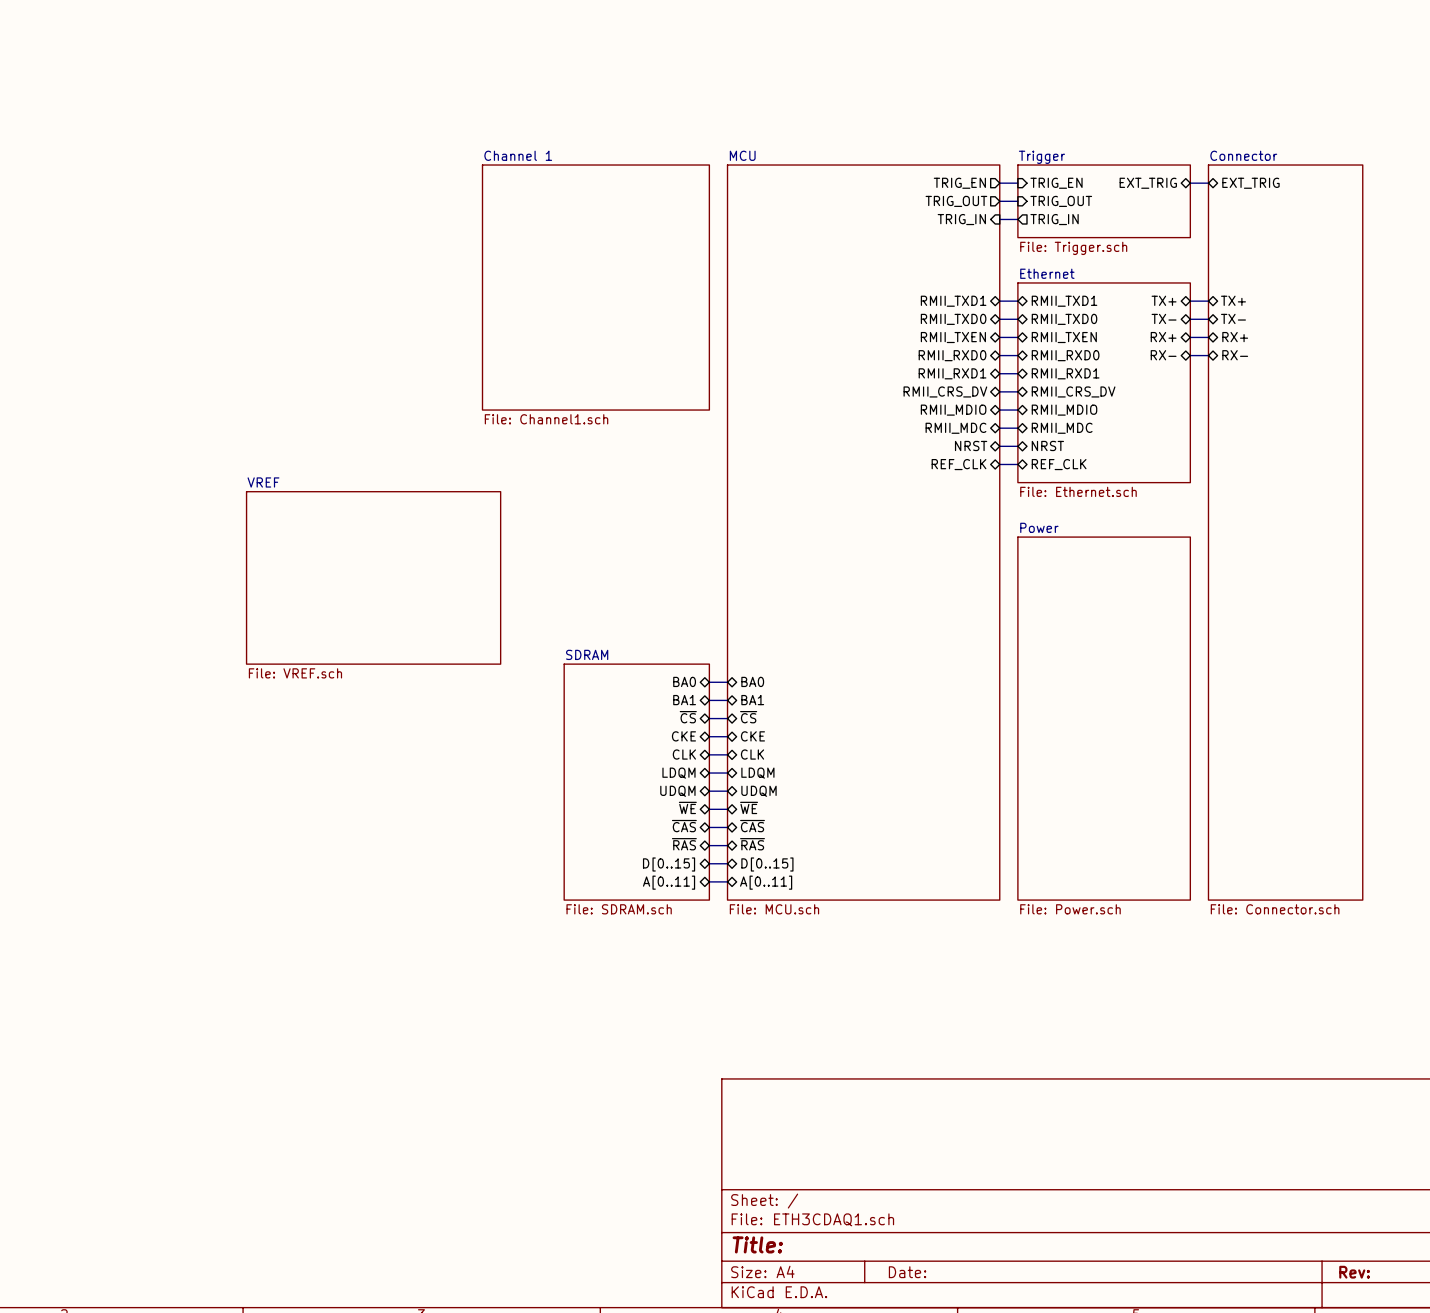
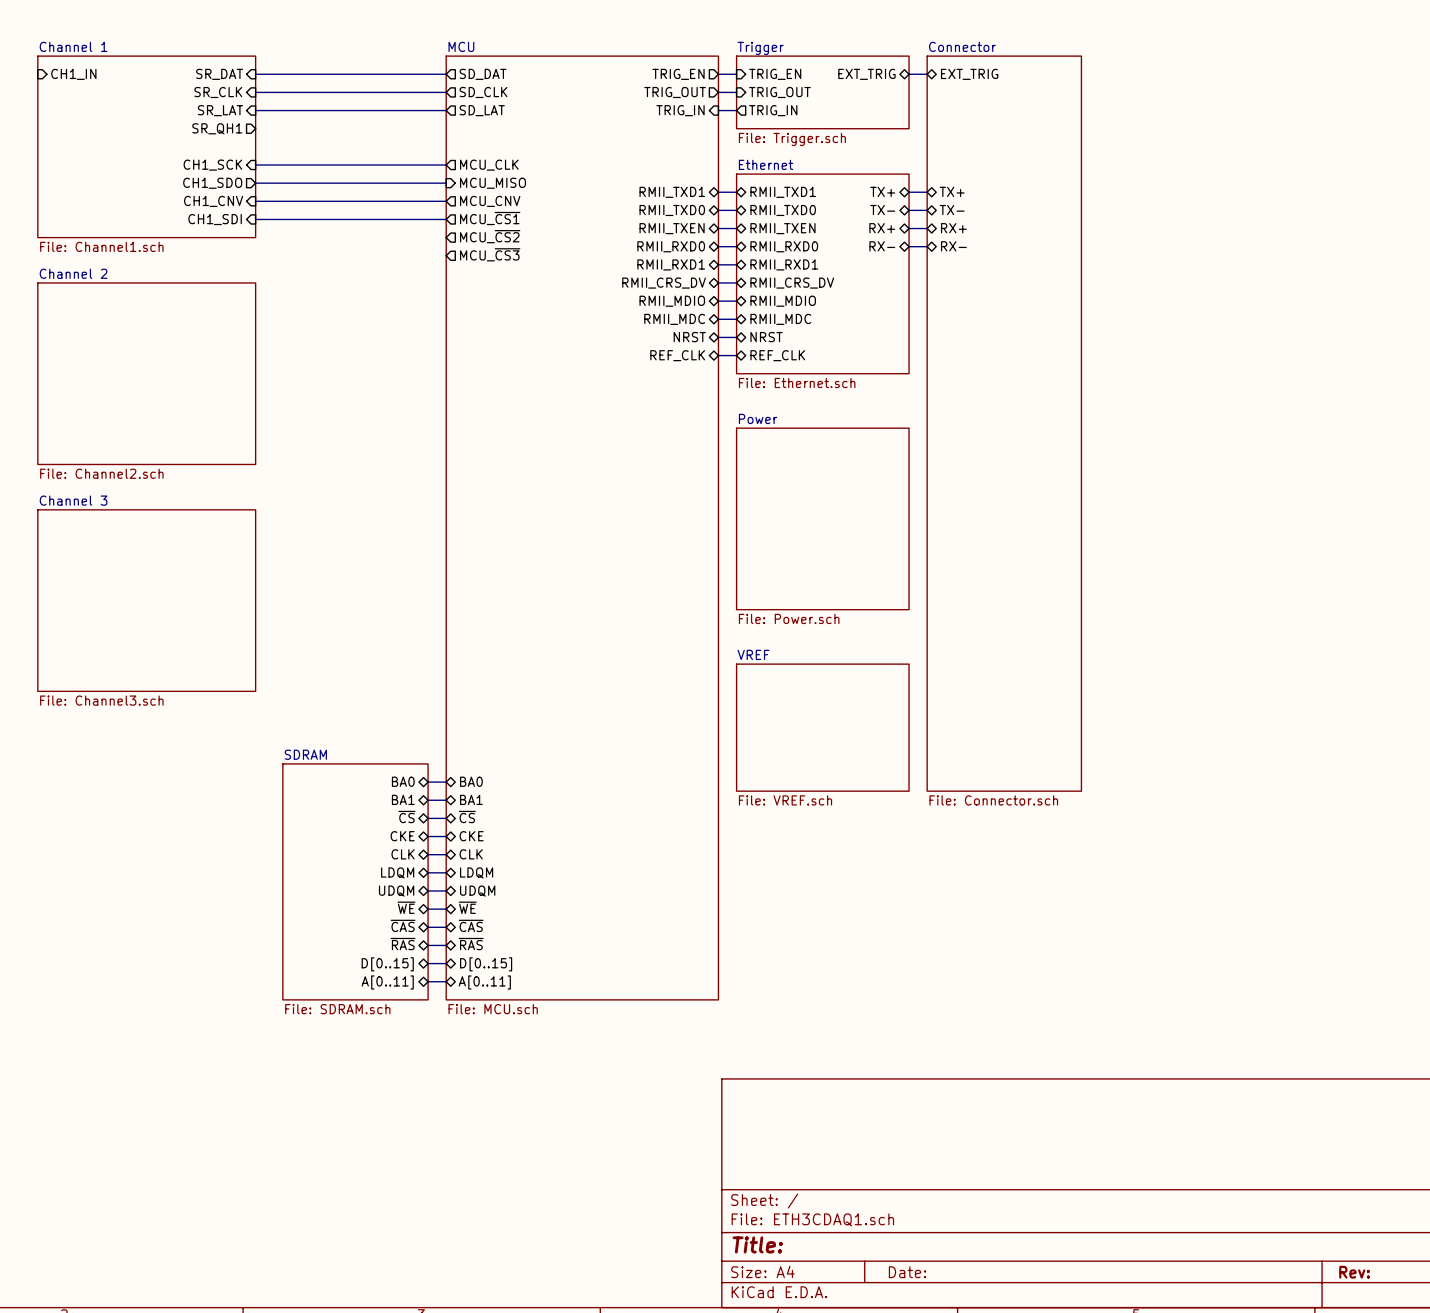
sheet pin: none -> CH1_IN (73, 74)
sheet pin: none -> SR_DAT (219, 74)
wire: none -> (255, 74) (446, 74)
sheet pin: none -> SD_DAT (483, 74)
sheet pin: none -> TRIG_EN (678, 74)
wire: none -> (718, 74) (736, 74)
sheet pin: none -> TRIG_EN (775, 74)
sheet pin: none -> EXT_TRIG (866, 74)
sheet pin: none -> EXT_TRIG (969, 74)
sheet pin: none -> SR_CLK (218, 92)
wire: none -> (255, 92) (446, 92)
sheet pin: none -> SD_CLK (483, 92)
sheet pin: none -> TRIG_OUT (675, 92)
wire: none -> (718, 92) (736, 92)
sheet pin: none -> TRIG_OUT (779, 92)
sheet Trigger: none -> File: Trigger.sch (822, 92)
sheet pin: none -> SR_LAT (220, 110)
wire: none -> (255, 110) (446, 110)
sheet pin: none -> SD_LAT (482, 110)
sheet pin: none -> TRIG_IN (680, 110)
wire: none -> (718, 110) (736, 110)
sheet pin: none -> TRIG_IN (773, 110)
sheet pin: none -> SR_QH1 (217, 128)
sheet Channel 1 name position: Channel 1 (518, 155) -> Channel 1 (73, 46)
sheet pin: none -> CH1_SCK (212, 165)
wire: none -> (255, 165) (446, 165)
sheet Channel 1 shape: [482, 165, 710, 411] -> [37, 56, 256, 238]
sheet pin: none -> MCU_CLK (489, 165)
sheet pin: none -> CH1_SDO (212, 183)
wire: none -> (255, 183) (446, 183)
sheet pin: none -> MCU_MISO (493, 183)
sheet pin: TRIG_EN (959, 183) -> none
wire: (999, 183) (1017, 183) -> (909, 74) (927, 74)
sheet pin: TRIG_EN (1056, 183) -> none
sheet pin: EXT_TRIG (1148, 183) -> none
wire: (1190, 183) (1208, 183) -> none
sheet pin: EXT_TRIG (1250, 183) -> none
sheet pin: none -> TX+ (882, 191)
sheet pin: none -> TX+ (952, 191)
sheet pin: none -> RMII_TXD1 (672, 192)
wire: none -> (718, 192) (736, 192)
sheet pin: none -> RMII_TXD1 (783, 192)
sheet pin: none -> CH1_CNV (213, 201)
wire: none -> (255, 201) (446, 201)
sheet pin: none -> MCU_CNV (490, 201)
sheet pin: TRIG_OUT (956, 201) -> none
wire: (999, 201) (1017, 201) -> none
sheet pin: TRIG_OUT (1061, 201) -> none
sheet Trigger: File: Trigger.sch (1104, 201) -> none
sheet pin: none -> RMII_TXD0 (672, 210)
wire: none -> (718, 210) (736, 210)
sheet pin: none -> RMII_TXD0 (783, 210)
sheet pin: none -> TX- (882, 210)
sheet pin: none -> TX- (952, 210)
sheet pin: none -> MCU_~{CS1} (490, 218)
sheet pin: none -> CH1_SDI (215, 219)
wire: none -> (255, 219) (446, 219)
sheet pin: TRIG_IN (961, 219) -> none
wire: (999, 219) (1017, 219) -> none
sheet pin: TRIG_IN (1054, 219) -> none
sheet pin: none -> RMII_TXEN (672, 228)
wire: none -> (718, 228) (736, 228)
sheet pin: none -> RMII_TXEN (782, 228)
sheet pin: none -> RX+ (882, 228)
sheet pin: none -> RX+ (953, 228)
sheet pin: none -> MCU_~{CS2} (490, 236)
sheet pin: none -> RMII_RXD0 (671, 246)
wire: none -> (718, 246) (736, 246)
sheet pin: none -> RMII_RXD0 (784, 246)
sheet pin: none -> RX- (882, 246)
sheet pin: none -> RX- (953, 246)
sheet pin: none -> MCU_~{CS3} (490, 254)
sheet pin: none -> RMII_RXD1 (671, 264)
wire: none -> (718, 264) (736, 264)
sheet pin: none -> RMII_RXD1 (784, 264)
sheet Ethernet: none -> File: Ethernet.sch (822, 273)
wire: none -> (718, 282) (736, 282)
sheet pin: none -> RMII_CRS_DV (664, 283)
sheet pin: none -> RMII_CRS_DV (792, 283)
sheet pin: TX+ (1164, 300) -> none
sheet pin: TX+ (1233, 300) -> none
sheet pin: none -> RMII_MDIO (672, 301)
wire: none -> (718, 301) (736, 301)
sheet pin: none -> RMII_MDIO (783, 301)
sheet pin: RMII_TXD1 (953, 301) -> none
wire: (999, 301) (1017, 301) -> (909, 192) (927, 192)
sheet pin: RMII_TXD1 (1064, 301) -> none
wire: (1190, 301) (1208, 301) -> none
sheet pin: TX- (1164, 318) -> none
sheet pin: TX- (1233, 318) -> none
sheet pin: none -> RMII_MDC (674, 319)
wire: none -> (718, 319) (736, 319)
sheet pin: none -> RMII_MDC (780, 319)
sheet pin: RMII_TXD0 (953, 319) -> none
wire: (999, 319) (1017, 319) -> (909, 210) (927, 210)
sheet pin: RMII_TXD0 (1064, 319) -> none
wire: (1190, 319) (1208, 319) -> none
sheet pin: none -> NRST (689, 337)
wire: none -> (718, 337) (736, 337)
sheet pin: none -> NRST (766, 337)
sheet pin: RMII_TXEN (953, 337) -> none
wire: (999, 337) (1017, 337) -> (909, 228) (927, 228)
sheet pin: RMII_TXEN (1064, 337) -> none
sheet pin: RX+ (1163, 337) -> none
wire: (1190, 337) (1208, 337) -> none
sheet pin: RX+ (1235, 337) -> none
sheet pin: none -> REF_CLK (677, 355)
wire: none -> (718, 355) (736, 355)
sheet pin: none -> REF_CLK (777, 355)
sheet pin: RMII_RXD0 (952, 355) -> none
wire: (999, 355) (1017, 355) -> (909, 246) (927, 246)
sheet pin: RMII_RXD0 (1065, 355) -> none
sheet pin: RX- (1163, 355) -> none
wire: (1190, 355) (1208, 355) -> none
sheet pin: RX- (1235, 355) -> none
sheet Channel 2: none -> File: Channel2.sch (146, 373)
sheet pin: RMII_RXD1 (952, 373) -> none
wire: (999, 373) (1017, 373) -> none
sheet pin: RMII_RXD1 (1065, 373) -> none
sheet Ethernet: File: Ethernet.sch (1104, 382) -> none
sheet pin: RMII_CRS_DV (945, 391) -> none
wire: (999, 391) (1017, 391) -> none
sheet pin: RMII_CRS_DV (1073, 391) -> none
sheet pin: RMII_MDIO (953, 410) -> none
wire: (999, 410) (1017, 410) -> none
sheet pin: RMII_MDIO (1064, 410) -> none
sheet Channel 1 value position: File: Channel1.sch (546, 419) -> File: Channel1.sch (101, 246)
sheet Connector: none -> File: Connector.sch (1004, 423)
sheet pin: RMII_MDC (955, 428) -> none
wire: (999, 428) (1017, 428) -> none
sheet pin: RMII_MDC (1062, 428) -> none
sheet pin: NRST (971, 445) -> none
sheet pin: NRST (1047, 445) -> none
wire: (999, 446) (1017, 446) -> none
sheet pin: REF_CLK (959, 464) -> none
wire: (999, 464) (1017, 464) -> none
sheet pin: REF_CLK (1059, 464) -> none
sheet Power: none -> File: Power.sch (822, 518)
sheet MCU: none -> File: MCU.sch (582, 528)
sheet MCU: File: MCU.sch (863, 532) -> none
sheet Connector: File: Connector.sch (1285, 532) -> none
sheet VREF: File: VREF.sch (373, 577) -> none
sheet Channel 3: none -> File: Channel3.sch (146, 600)
sheet pin: BA0 (684, 681) -> none
sheet pin: BA0 (752, 681) -> none
wire: (709, 682) (727, 682) -> none
sheet pin: BA1 (684, 700) -> none
wire: (709, 700) (727, 700) -> none
sheet pin: BA1 (752, 700) -> none
sheet pin: ~{CS} (688, 717) -> none
sheet pin: ~{CS} (748, 717) -> none
wire: (709, 718) (727, 718) -> none
sheet Power: File: Power.sch (1104, 718) -> none
sheet VREF: none -> File: VREF.sch (822, 727)
sheet pin: CKE (683, 736) -> none
wire: (709, 736) (727, 736) -> none
sheet pin: CKE (752, 736) -> none
sheet pin: CLK (684, 754) -> none
wire: (709, 754) (727, 754) -> none
sheet pin: CLK (752, 754) -> none
sheet pin: LDQM (678, 773) -> none
wire: (709, 773) (727, 773) -> none
sheet pin: LDQM (757, 773) -> none
sheet pin: none -> BA0 (403, 781)
sheet pin: none -> BA0 (471, 781)
wire: none -> (428, 782) (446, 782)
sheet SDRAM: File: SDRAM.sch (636, 782) -> none
sheet pin: UDQM (677, 791) -> none
wire: (709, 791) (727, 791) -> none
sheet pin: UDQM (758, 791) -> none
sheet pin: none -> BA1 (403, 799)
sheet pin: none -> BA1 (471, 799)
wire: none -> (428, 800) (446, 800)
sheet pin: ~{WE} (687, 807) -> none
sheet pin: ~{WE} (749, 807) -> none
wire: (709, 809) (727, 809) -> none
sheet pin: none -> ~{CS} (406, 817)
sheet pin: none -> ~{CS} (467, 817)
wire: none -> (428, 818) (446, 818)
sheet pin: ~{CAS} (684, 826) -> none
sheet pin: ~{CAS} (752, 826) -> none
wire: (709, 827) (727, 827) -> none
sheet pin: none -> CKE (402, 836)
wire: none -> (428, 836) (446, 836)
sheet pin: none -> CKE (471, 836)
sheet pin: ~{RAS} (684, 844) -> none
sheet pin: ~{RAS} (752, 844) -> none
wire: (709, 845) (727, 845) -> none
sheet pin: none -> CLK (403, 854)
wire: none -> (428, 854) (446, 854)
sheet pin: none -> CLK (471, 854)
bus: (709, 863) (727, 863) -> none
sheet pin: D[0..15] (669, 864) -> none
sheet pin: D[0..15] (767, 864) -> none
sheet pin: none -> LDQM (397, 872)
wire: none -> (428, 872) (446, 872)
sheet pin: none -> LDQM (476, 872)
sheet SDRAM: none -> File: SDRAM.sch (355, 881)
bus: (709, 881) (727, 881) -> none
sheet pin: A[0..11] (669, 882) -> none
sheet pin: A[0..11] (766, 882) -> none
wire: none -> (428, 890) (446, 890)
sheet pin: none -> UDQM (396, 891)
sheet pin: none -> UDQM (477, 891)
sheet pin: none -> ~{WE} (406, 907)
sheet pin: none -> ~{WE} (467, 907)
wire: none -> (428, 909) (446, 909)
sheet pin: none -> ~{CAS} (403, 925)
sheet pin: none -> ~{CAS} (471, 925)
wire: none -> (428, 927) (446, 927)
sheet pin: none -> ~{RAS} (403, 944)
sheet pin: none -> ~{RAS} (471, 944)
wire: none -> (428, 945) (446, 945)
bus: none -> (428, 963) (446, 963)
sheet pin: none -> D[0..15] (387, 964)
sheet pin: none -> D[0..15] (486, 964)
bus: none -> (428, 981) (446, 981)
sheet pin: none -> A[0..11] (387, 982)
sheet pin: none -> A[0..11] (484, 982)

